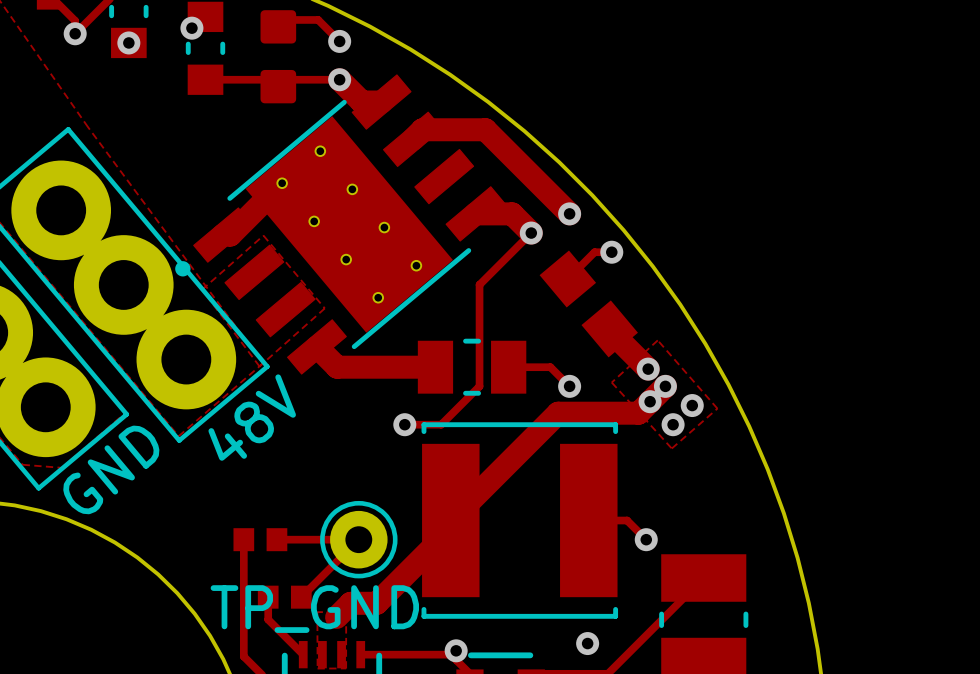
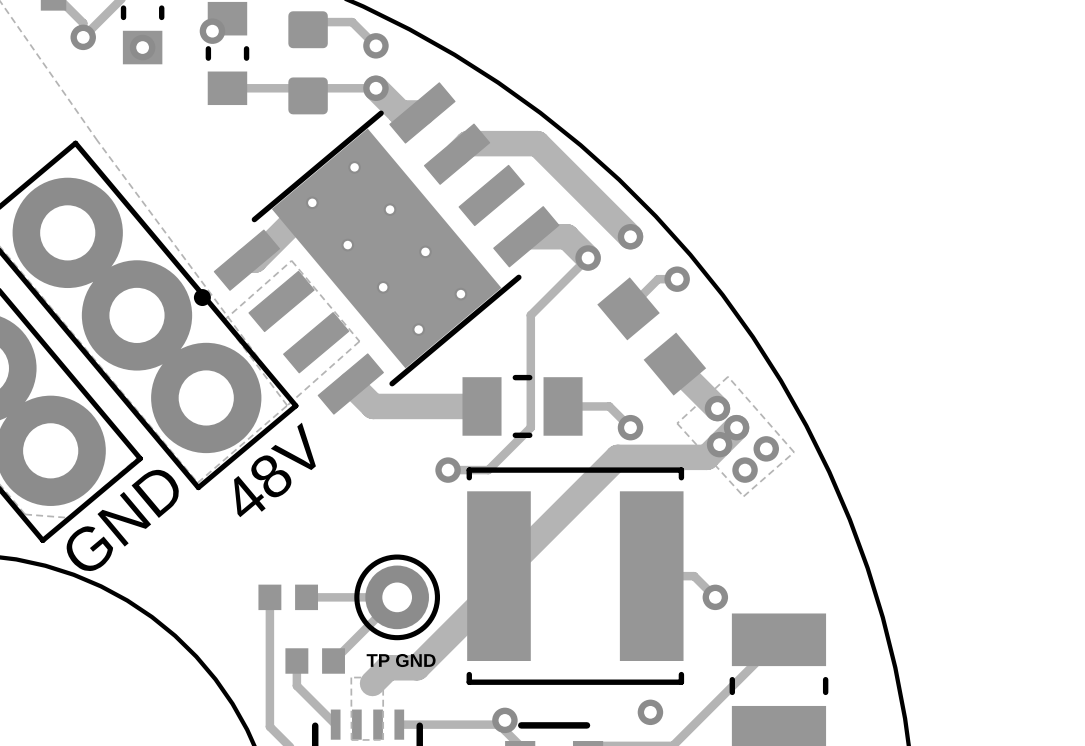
TP_GND name: TP_GND (314, 609) -> TP GND (401, 660)

